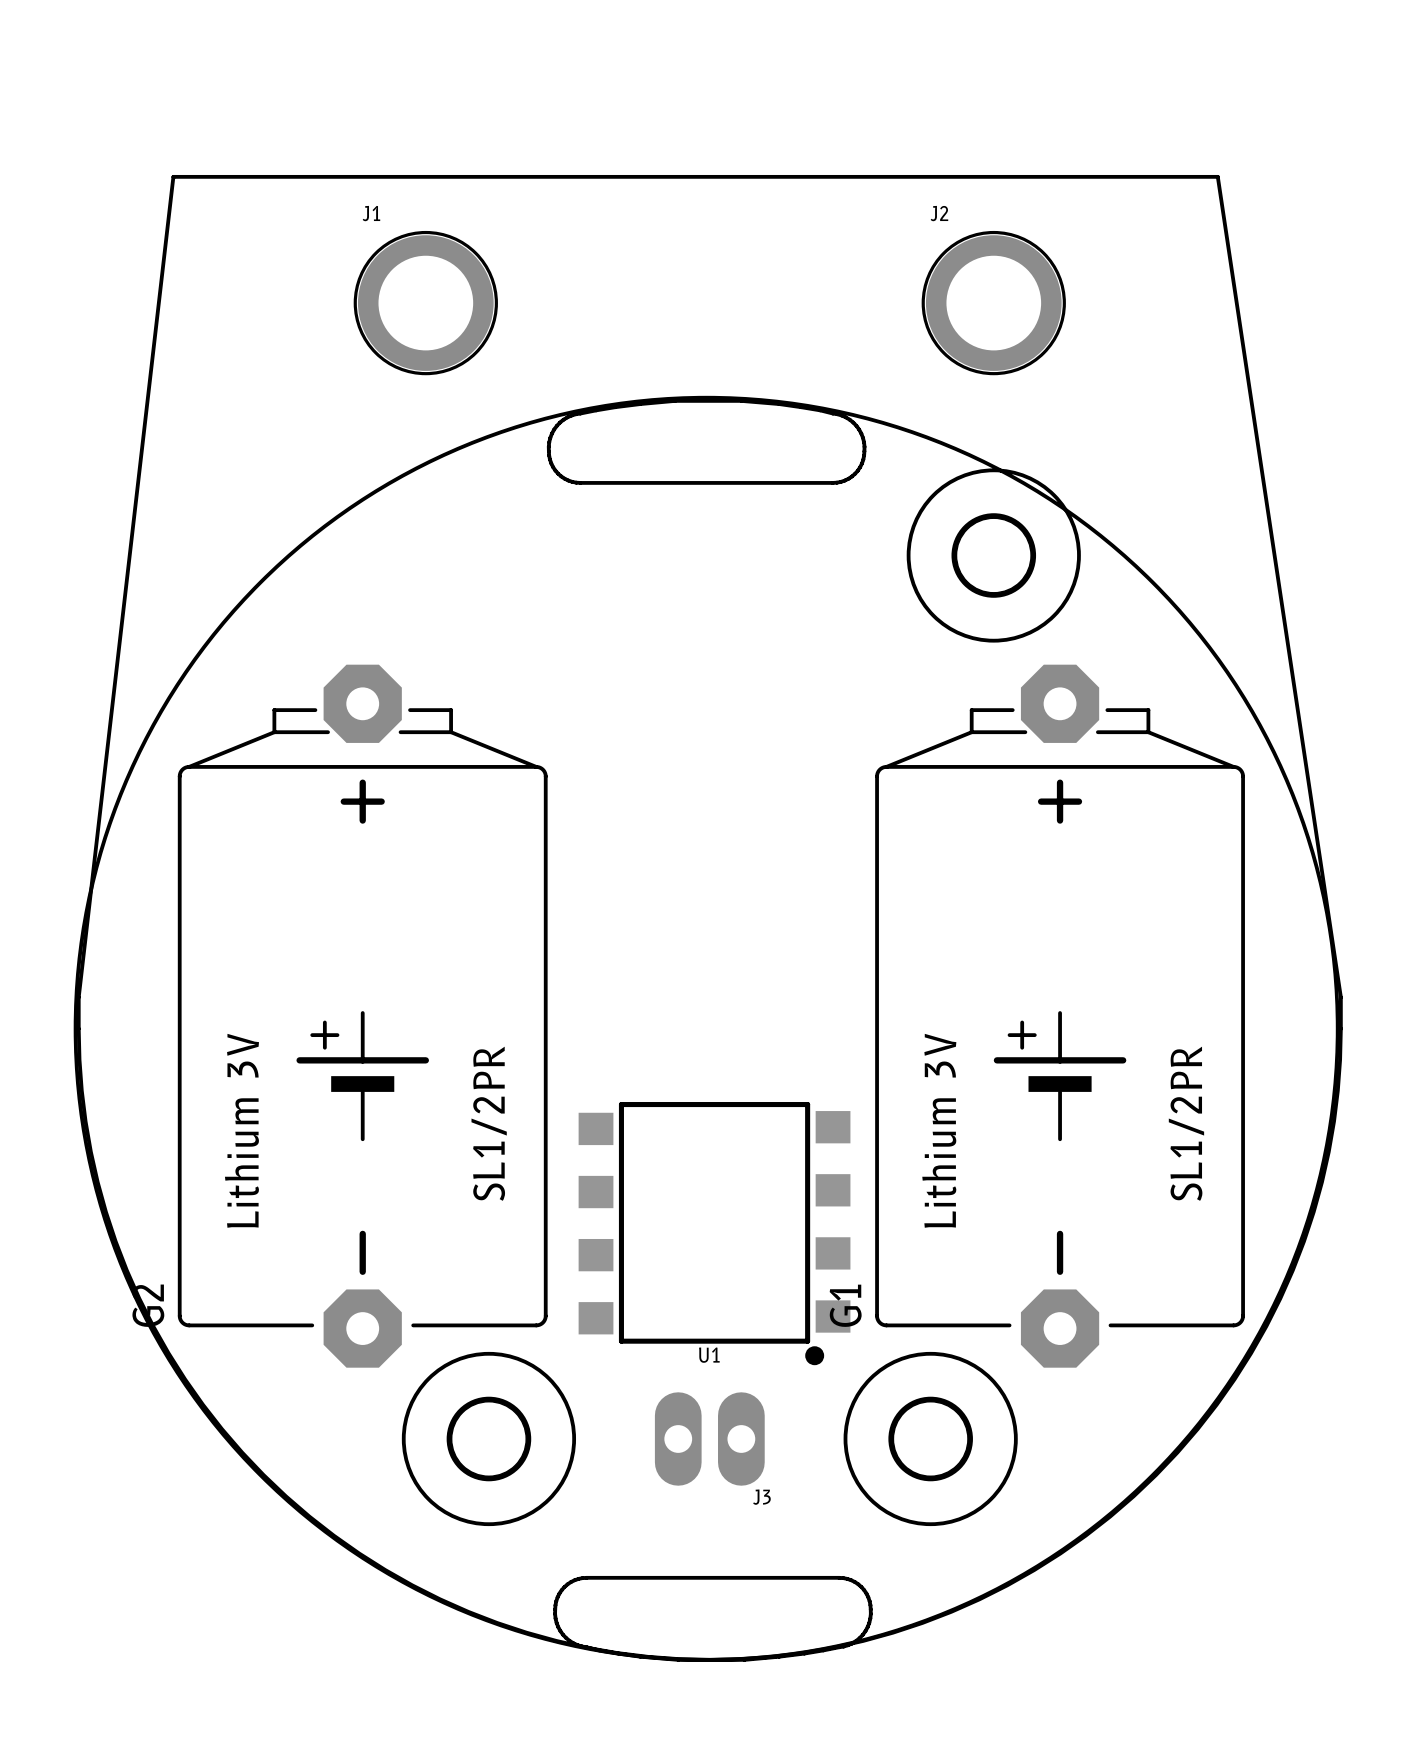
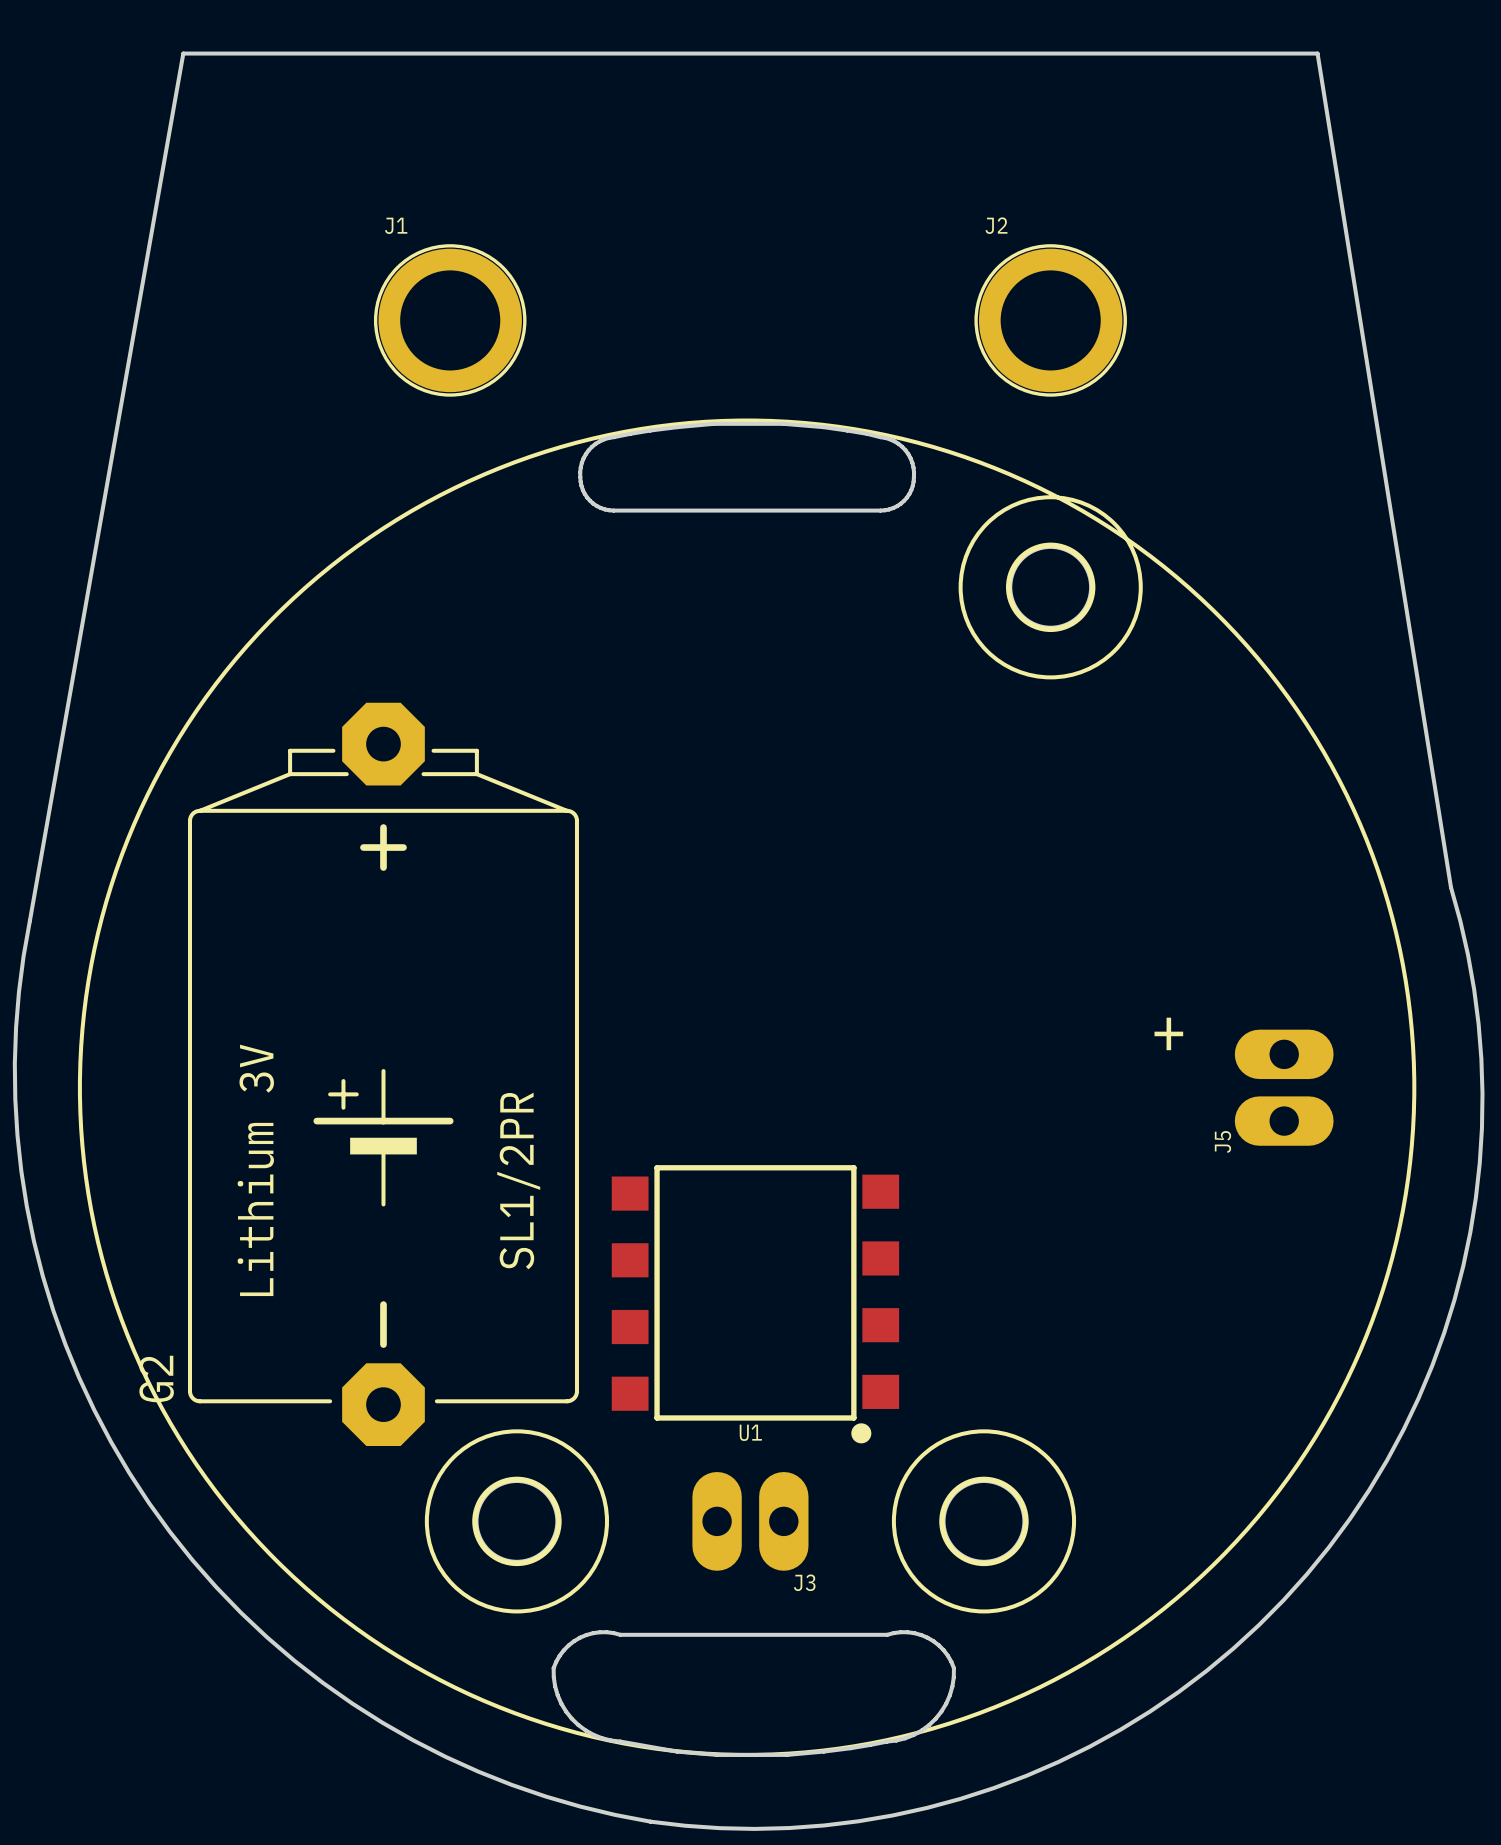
board edge: (173, 176) (78, 997) (81, 1090) (85, 1121) (97, 1182) (105, 1211) (126, 1270) (153, 1326) (168, 1353) (202, 1404) (242, 1452) (286, 1496) (333, 1535) (385, 1570) (439, 1599) (497, 1622) (556, 1640) (617, 1653) (678, 1659) (740, 1659) (802, 1653) (863, 1640) (922, 1622) (979, 1599) (1034, 1570) (1085, 1535) (1133, 1496) (1177, 1452) (1197, 1429) (1234, 1379) (1266, 1326) (1292, 1270) (1313, 1211) (1321, 1182) (1334, 1121) (1340, 1059) (1340, 997) (1217, 176) (173, 176) -> (183, 53) (23, 956) (16, 1027) (15, 1099) (17, 1135) (21, 1170) (34, 1241) (53, 1310) (65, 1344) (79, 1377) (111, 1441) (148, 1502) (192, 1560) (241, 1612) (294, 1660) (352, 1703) (413, 1740) (478, 1771) (545, 1796) (615, 1814) (684, 1825) (754, 1828) (824, 1825) (893, 1815) (960, 1798) (1026, 1775) (1089, 1746) (1150, 1711) (1178, 1691) (1233, 1648) (1283, 1600) (1329, 1547) (1349, 1519) (1387, 1460) (1403, 1429) (1432, 1366) (1454, 1300) (1463, 1266) (1475, 1197) (1481, 1128) (1482, 1093) (1478, 1024) (1474, 989) (1468, 955) (1451, 887) (1317, 53) (183, 53)
text: none -> + (1168, 1033)
G1: (1060, 1016) -> none
J5: none -> (1284, 1087)
board edge: (839, 1647) (852, 1643) (859, 1638) (865, 1631) (870, 1618) (870, 1605) (866, 1593) (858, 1584) (847, 1578) (586, 1577) (574, 1580) (564, 1587) (557, 1597) (555, 1613) (558, 1627) (566, 1638) (582, 1646) (640, 1656) -> (887, 1741) (905, 1738) (921, 1730) (935, 1718) (949, 1695) (953, 1677) (953, 1668) (951, 1661) (938, 1645) (921, 1635) (907, 1632) (887, 1634) (620, 1634) (599, 1632) (580, 1637) (563, 1650) (553, 1668) (555, 1686) (566, 1711) (578, 1725) (602, 1738) (677, 1751)

